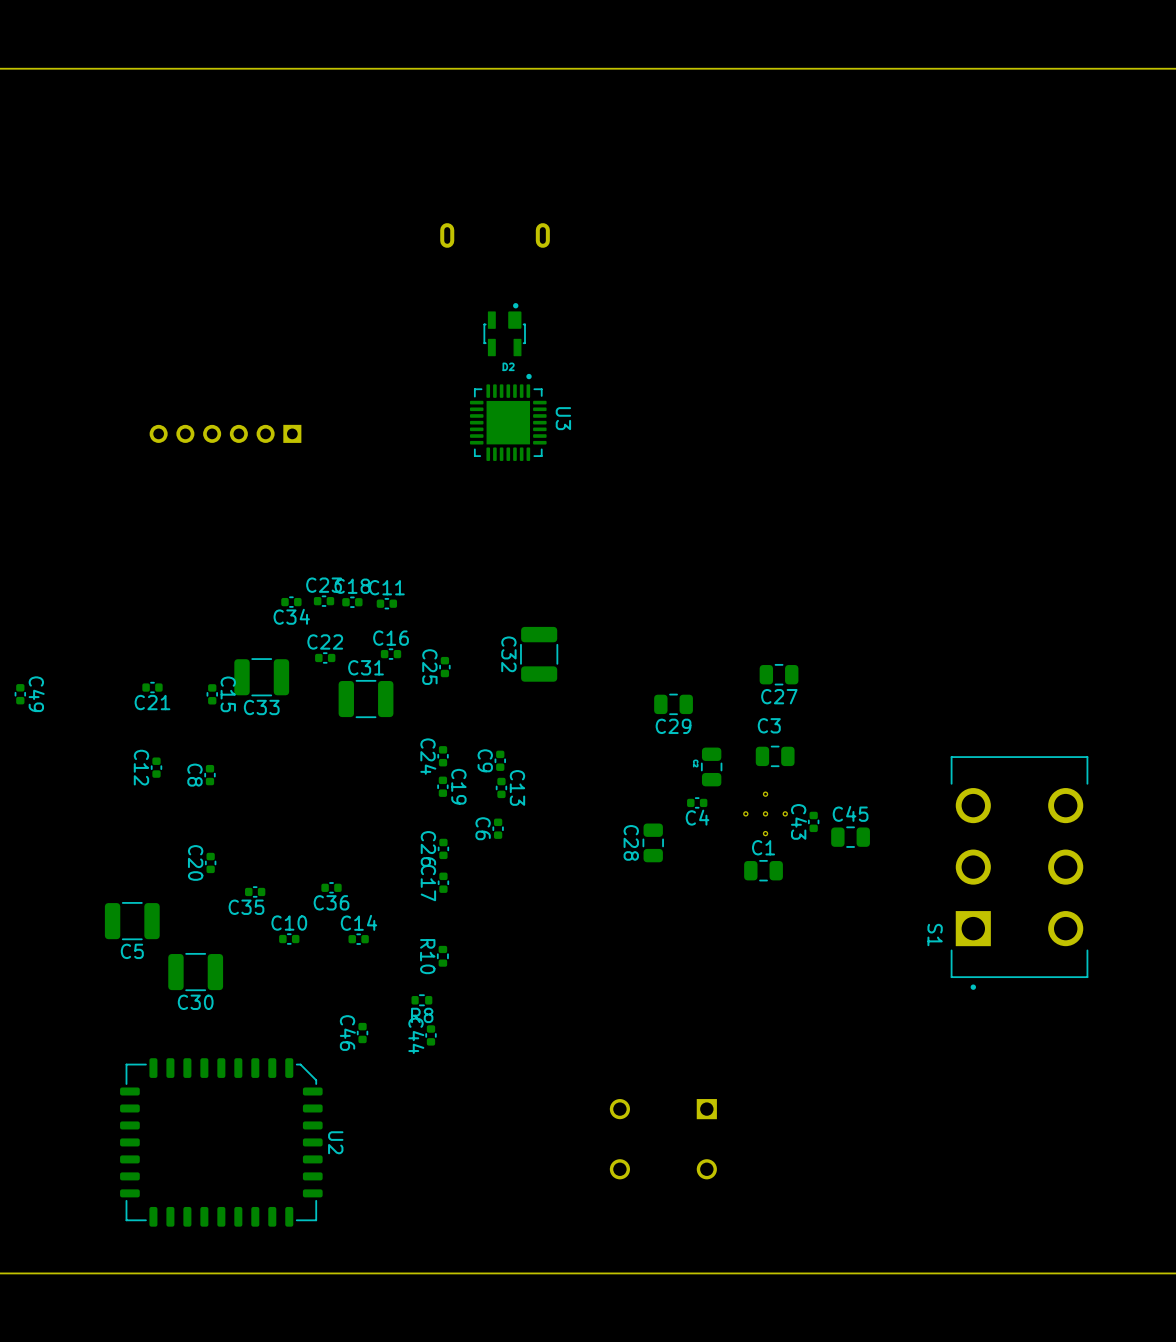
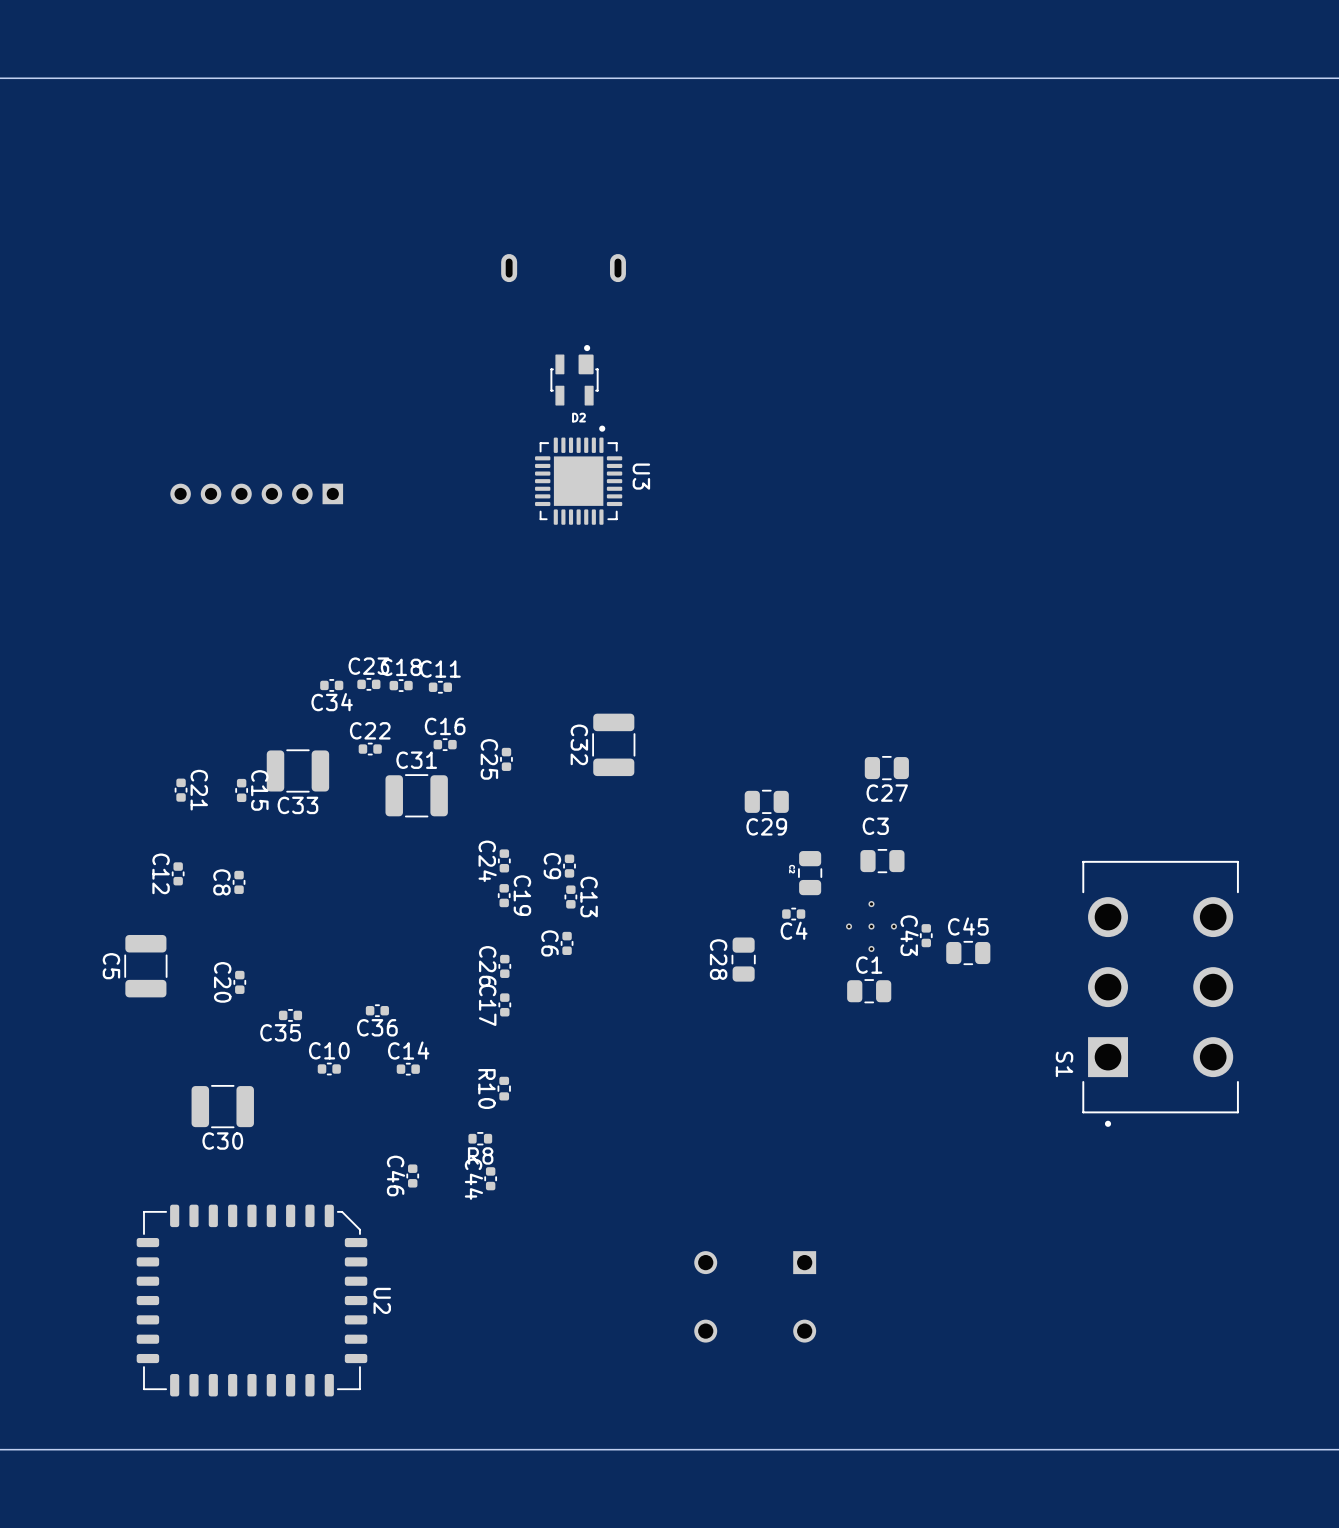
C21 rotation: 0° (152, 687) -> 90° clockwise (181, 790)
C49: (20, 694) -> none
C5 rotation: 0° (132, 921) -> 90° clockwise (145, 966)
C5 position: (132, 921) -> (145, 966)

